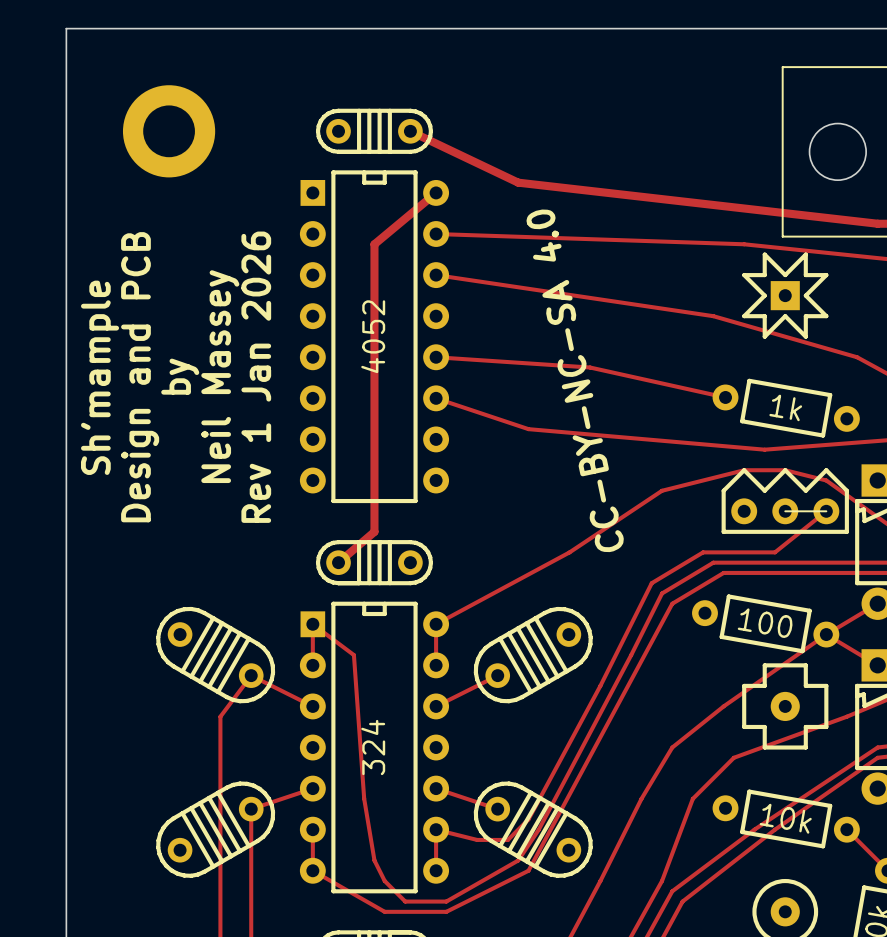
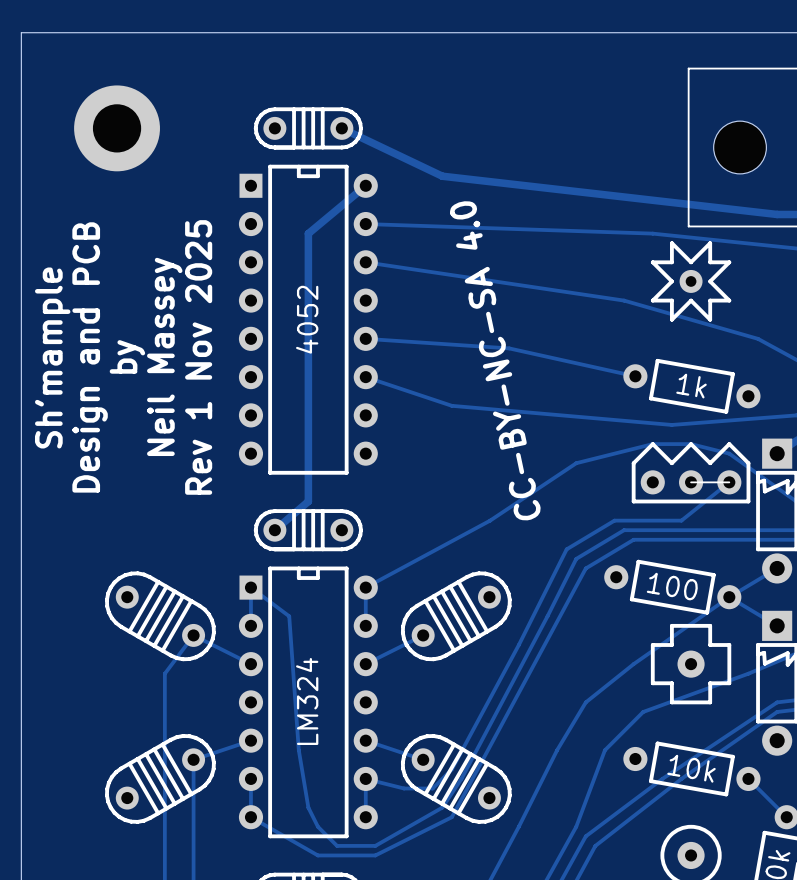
part footprint: [742, 252, 829, 339] -> [650, 241, 732, 322]
text: Rev 1 Jan 2026 (256, 377) -> Rev 1 Nov 2025 (198, 357)
part value: 324 (373, 747) -> LM324 (307, 701)

